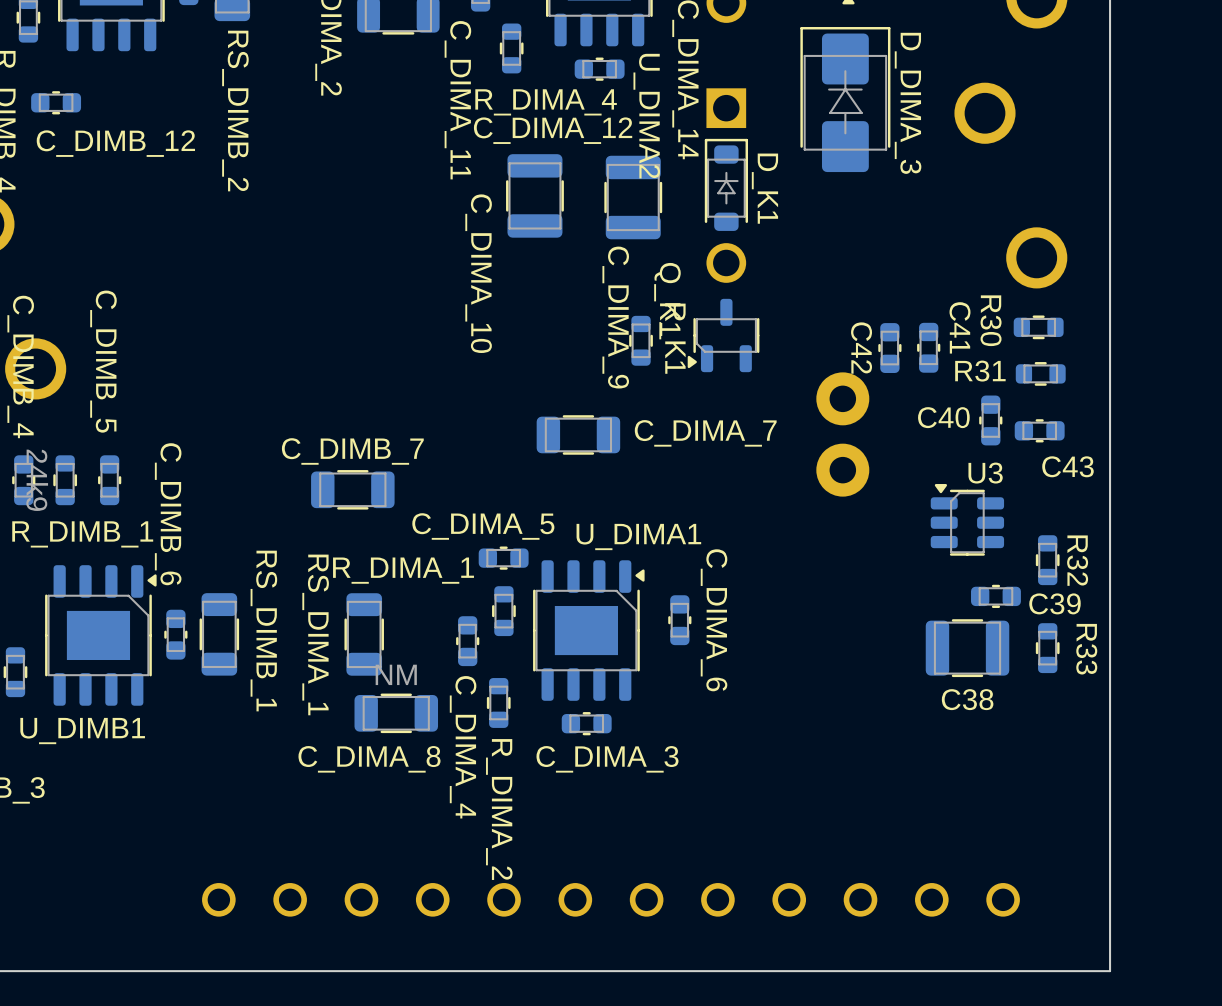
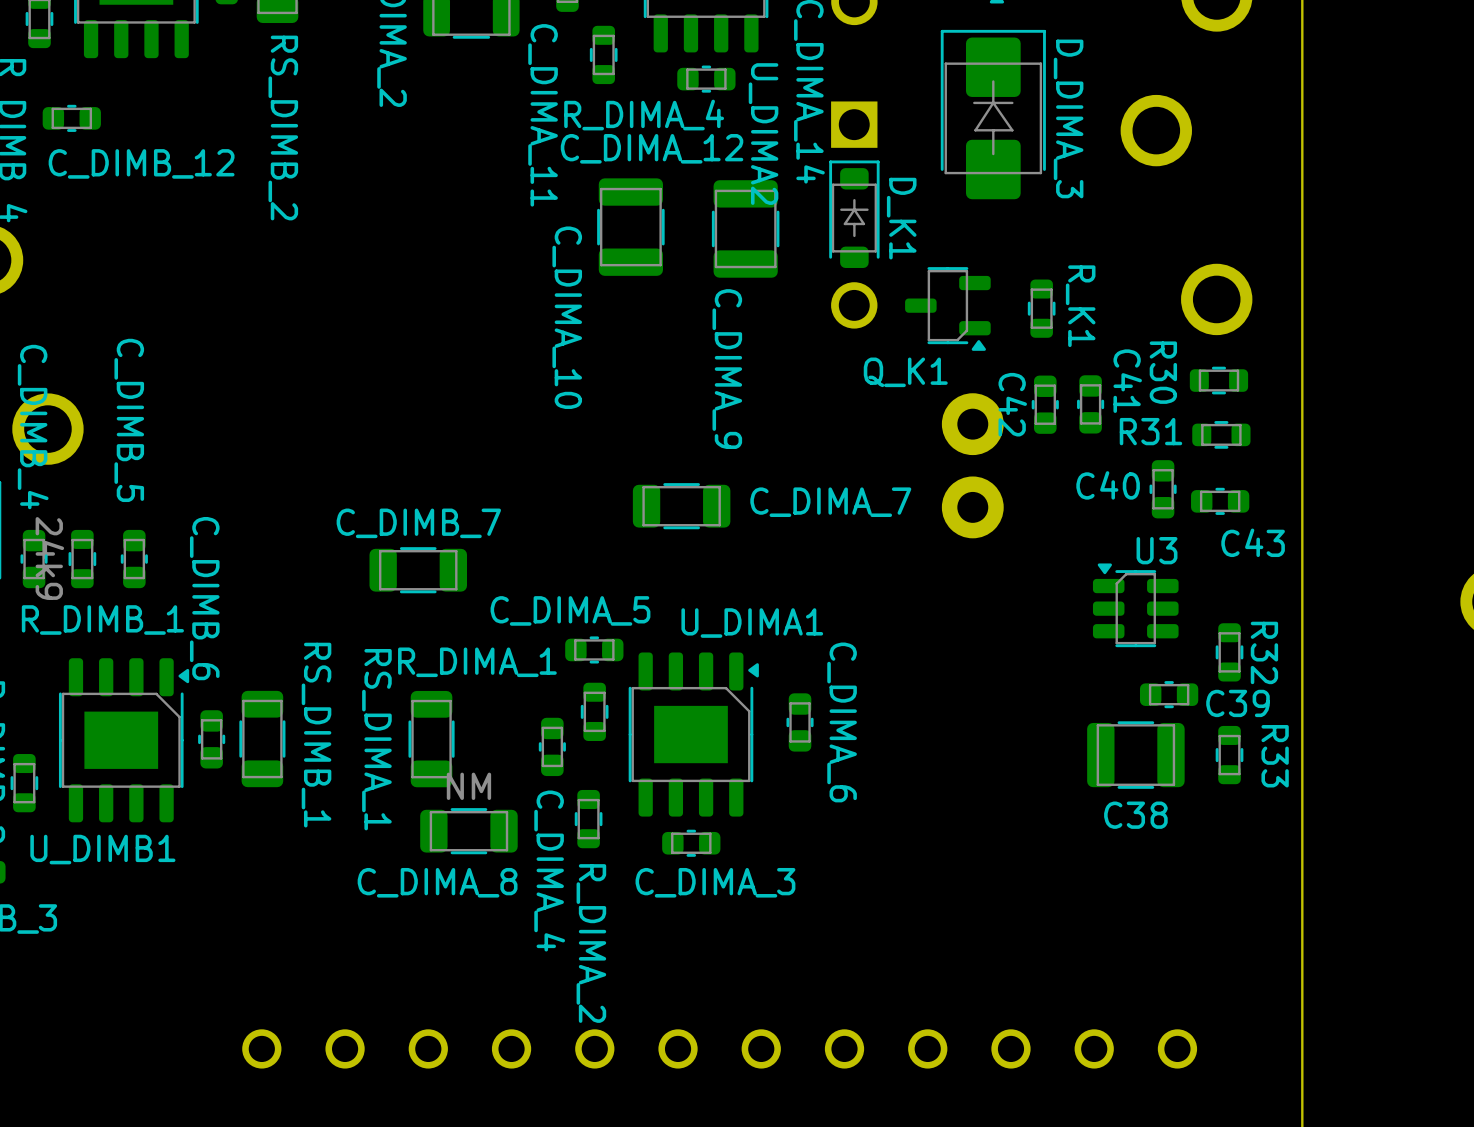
Q_K1 rotation: 0° (723, 335) -> 90° counterclockwise (947, 308)
Q_K1 position: (723, 335) -> (947, 308)
R_K1 position: (641, 340) -> (1041, 308)
part position: (842, 434) -> (972, 465)

